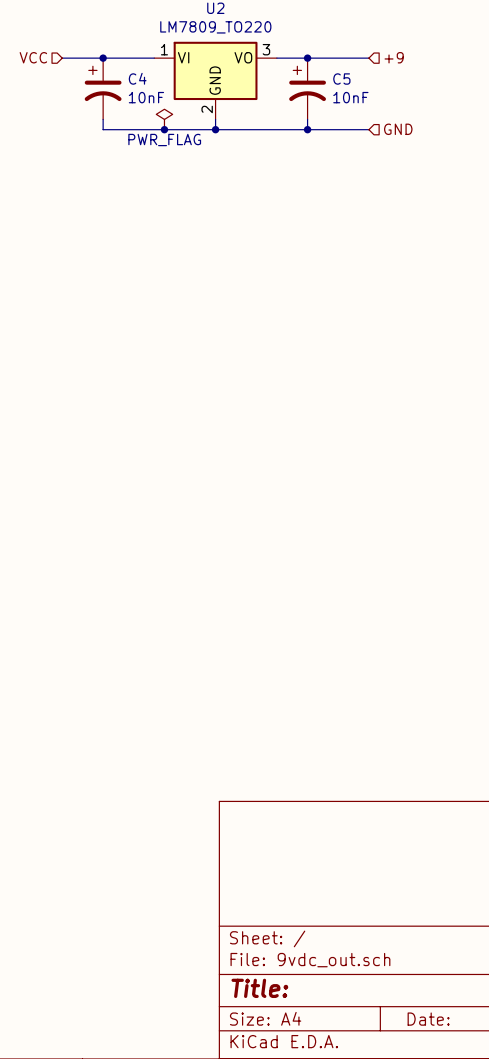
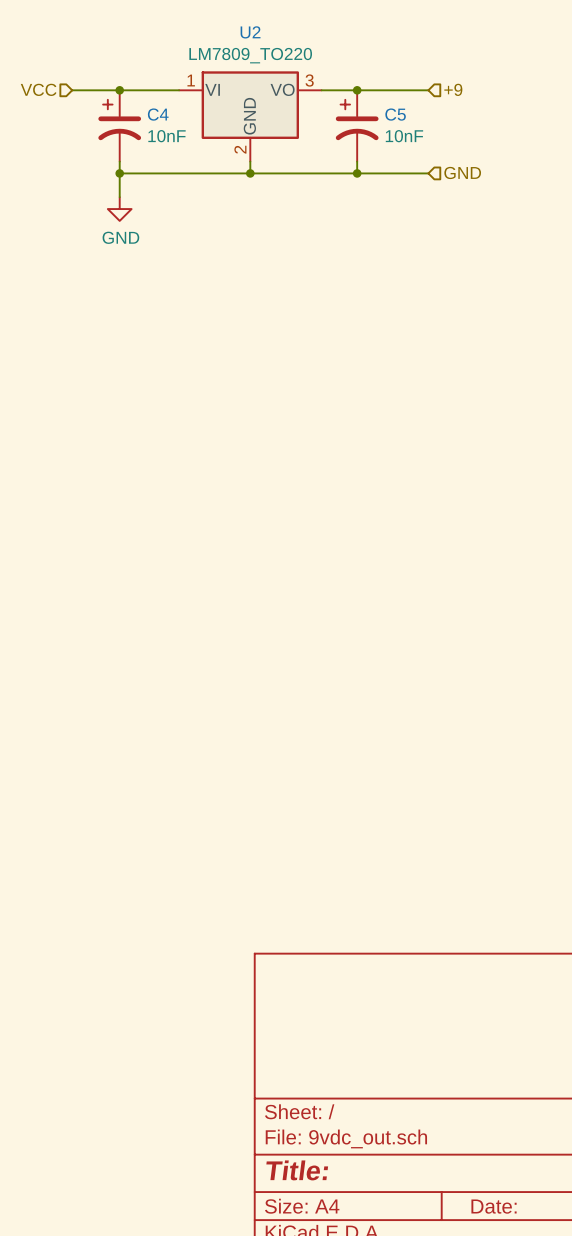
power symbol: PWR_FLAG (164, 119) -> none
wire: none -> (119, 173) (119, 197)
junction: none -> (119, 173)
junction: (164, 129) -> none
power symbol: none -> GND (119, 209)

